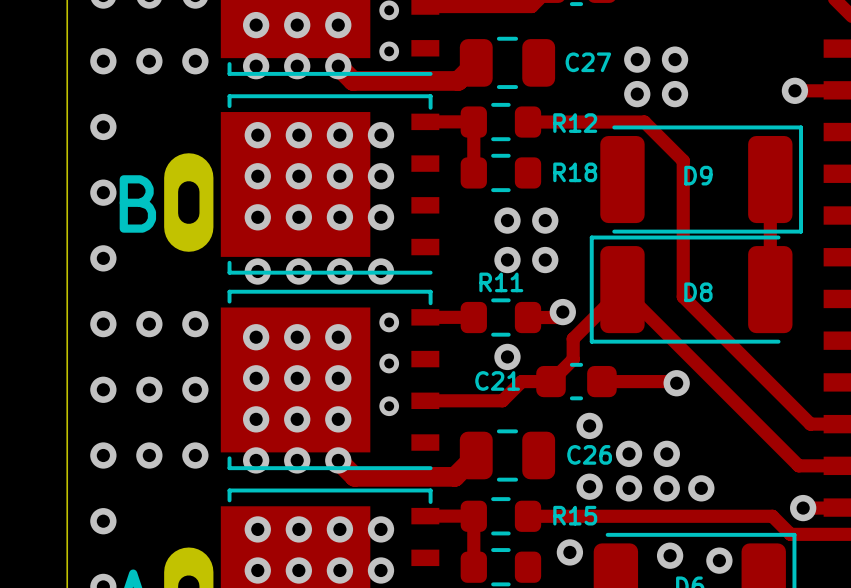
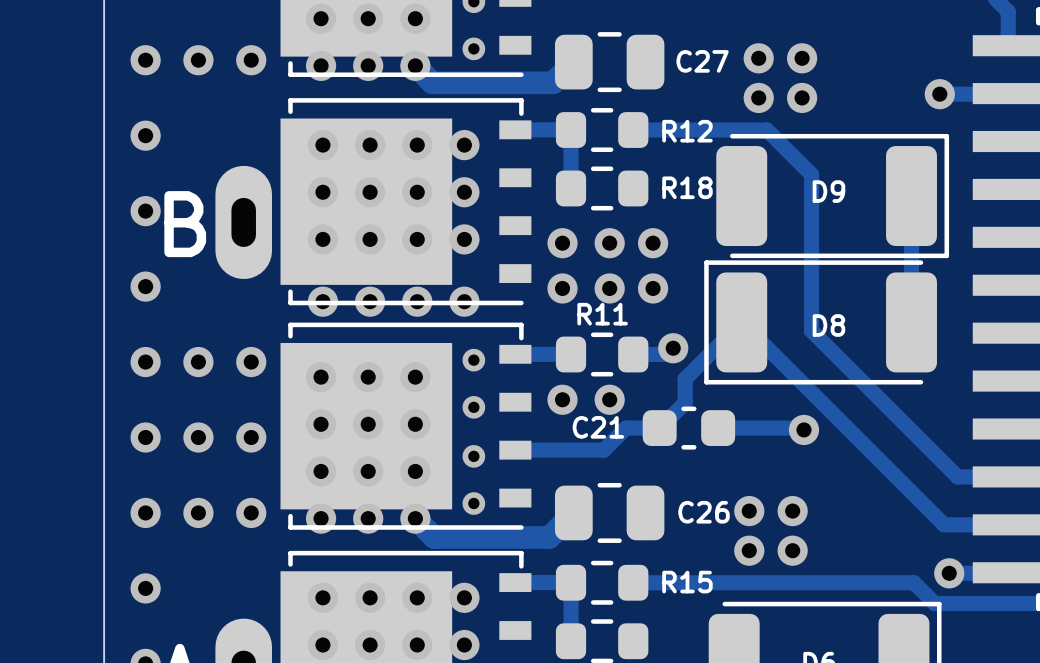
via: none -> (562, 243)
via: none -> (562, 288)
via: none -> (562, 399)
via: (589, 425) -> none
via: none -> (473, 503)
via: (589, 486) -> none
via: (701, 488) -> none
via: (569, 552) -> none
via: (670, 555) -> none
via: (719, 560) -> none

